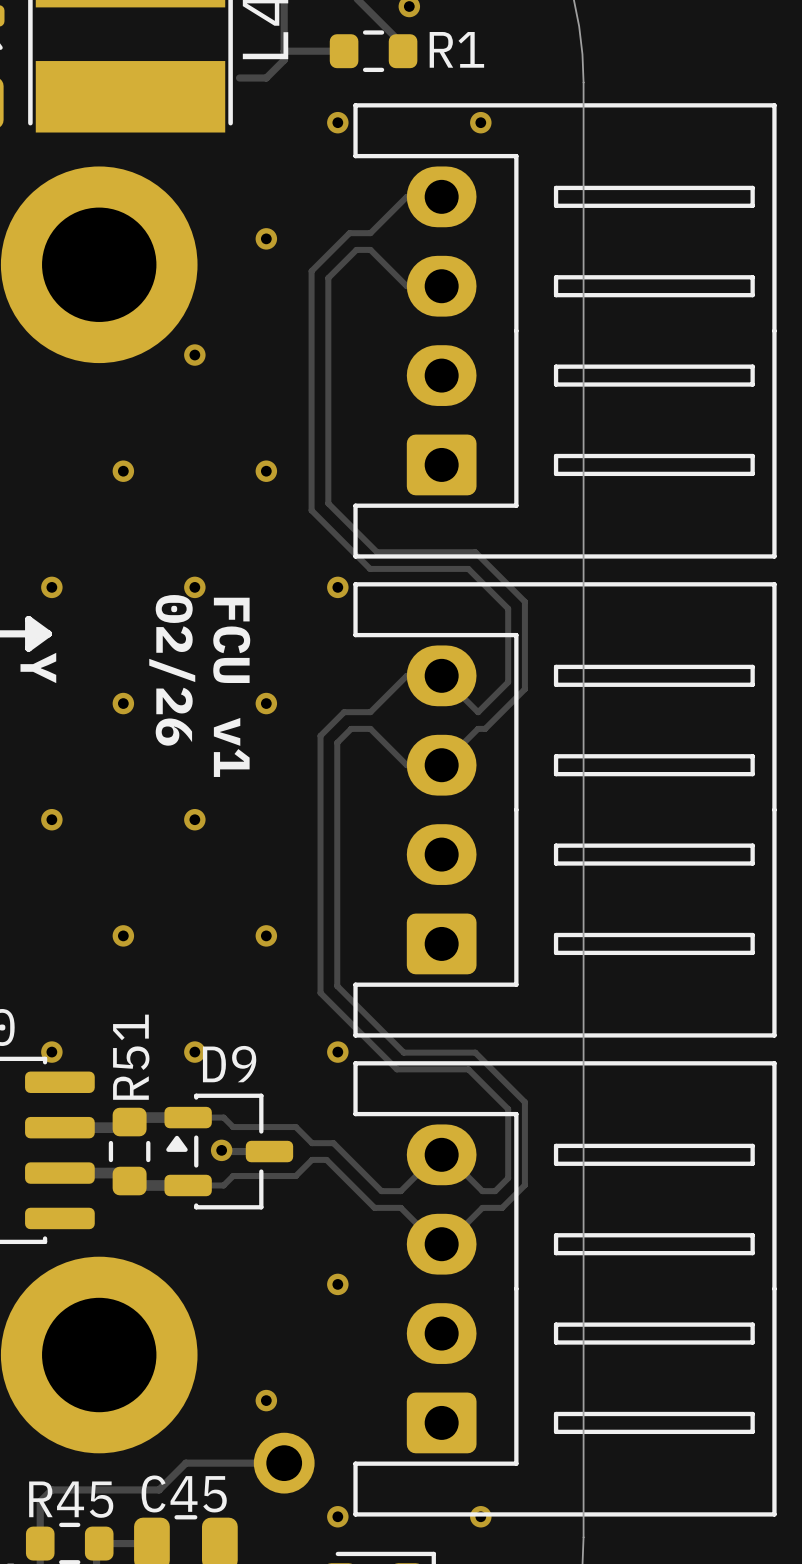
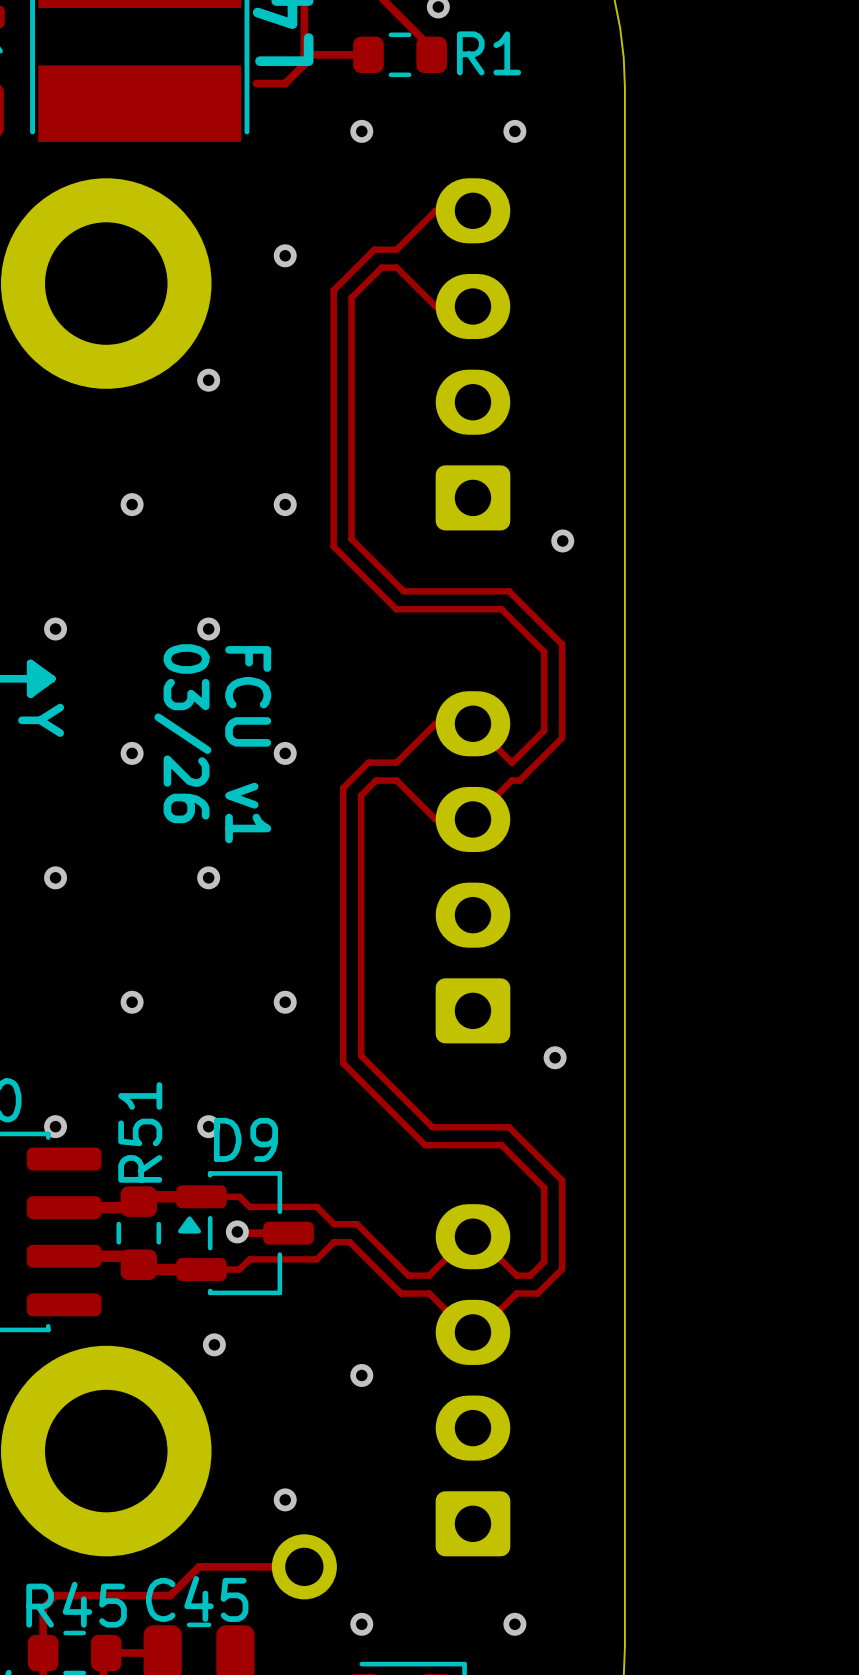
part: (564, 330) -> none
via position: (337, 587) -> (562, 540)
text: 02/26 (172, 670) -> 03/26 (182, 733)
part: (564, 809) -> none
via: none -> (555, 1057)
via: (337, 1052) -> none
via: none -> (214, 1344)
part: (564, 1288) -> none

